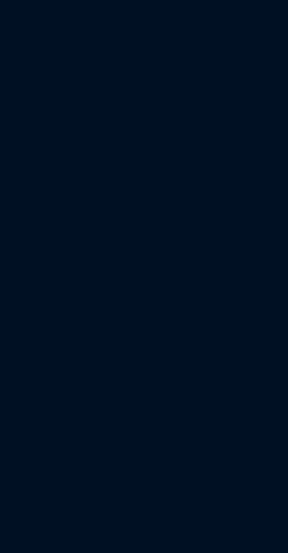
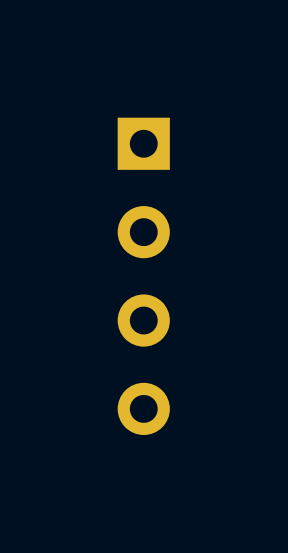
part: none -> (143, 276)

